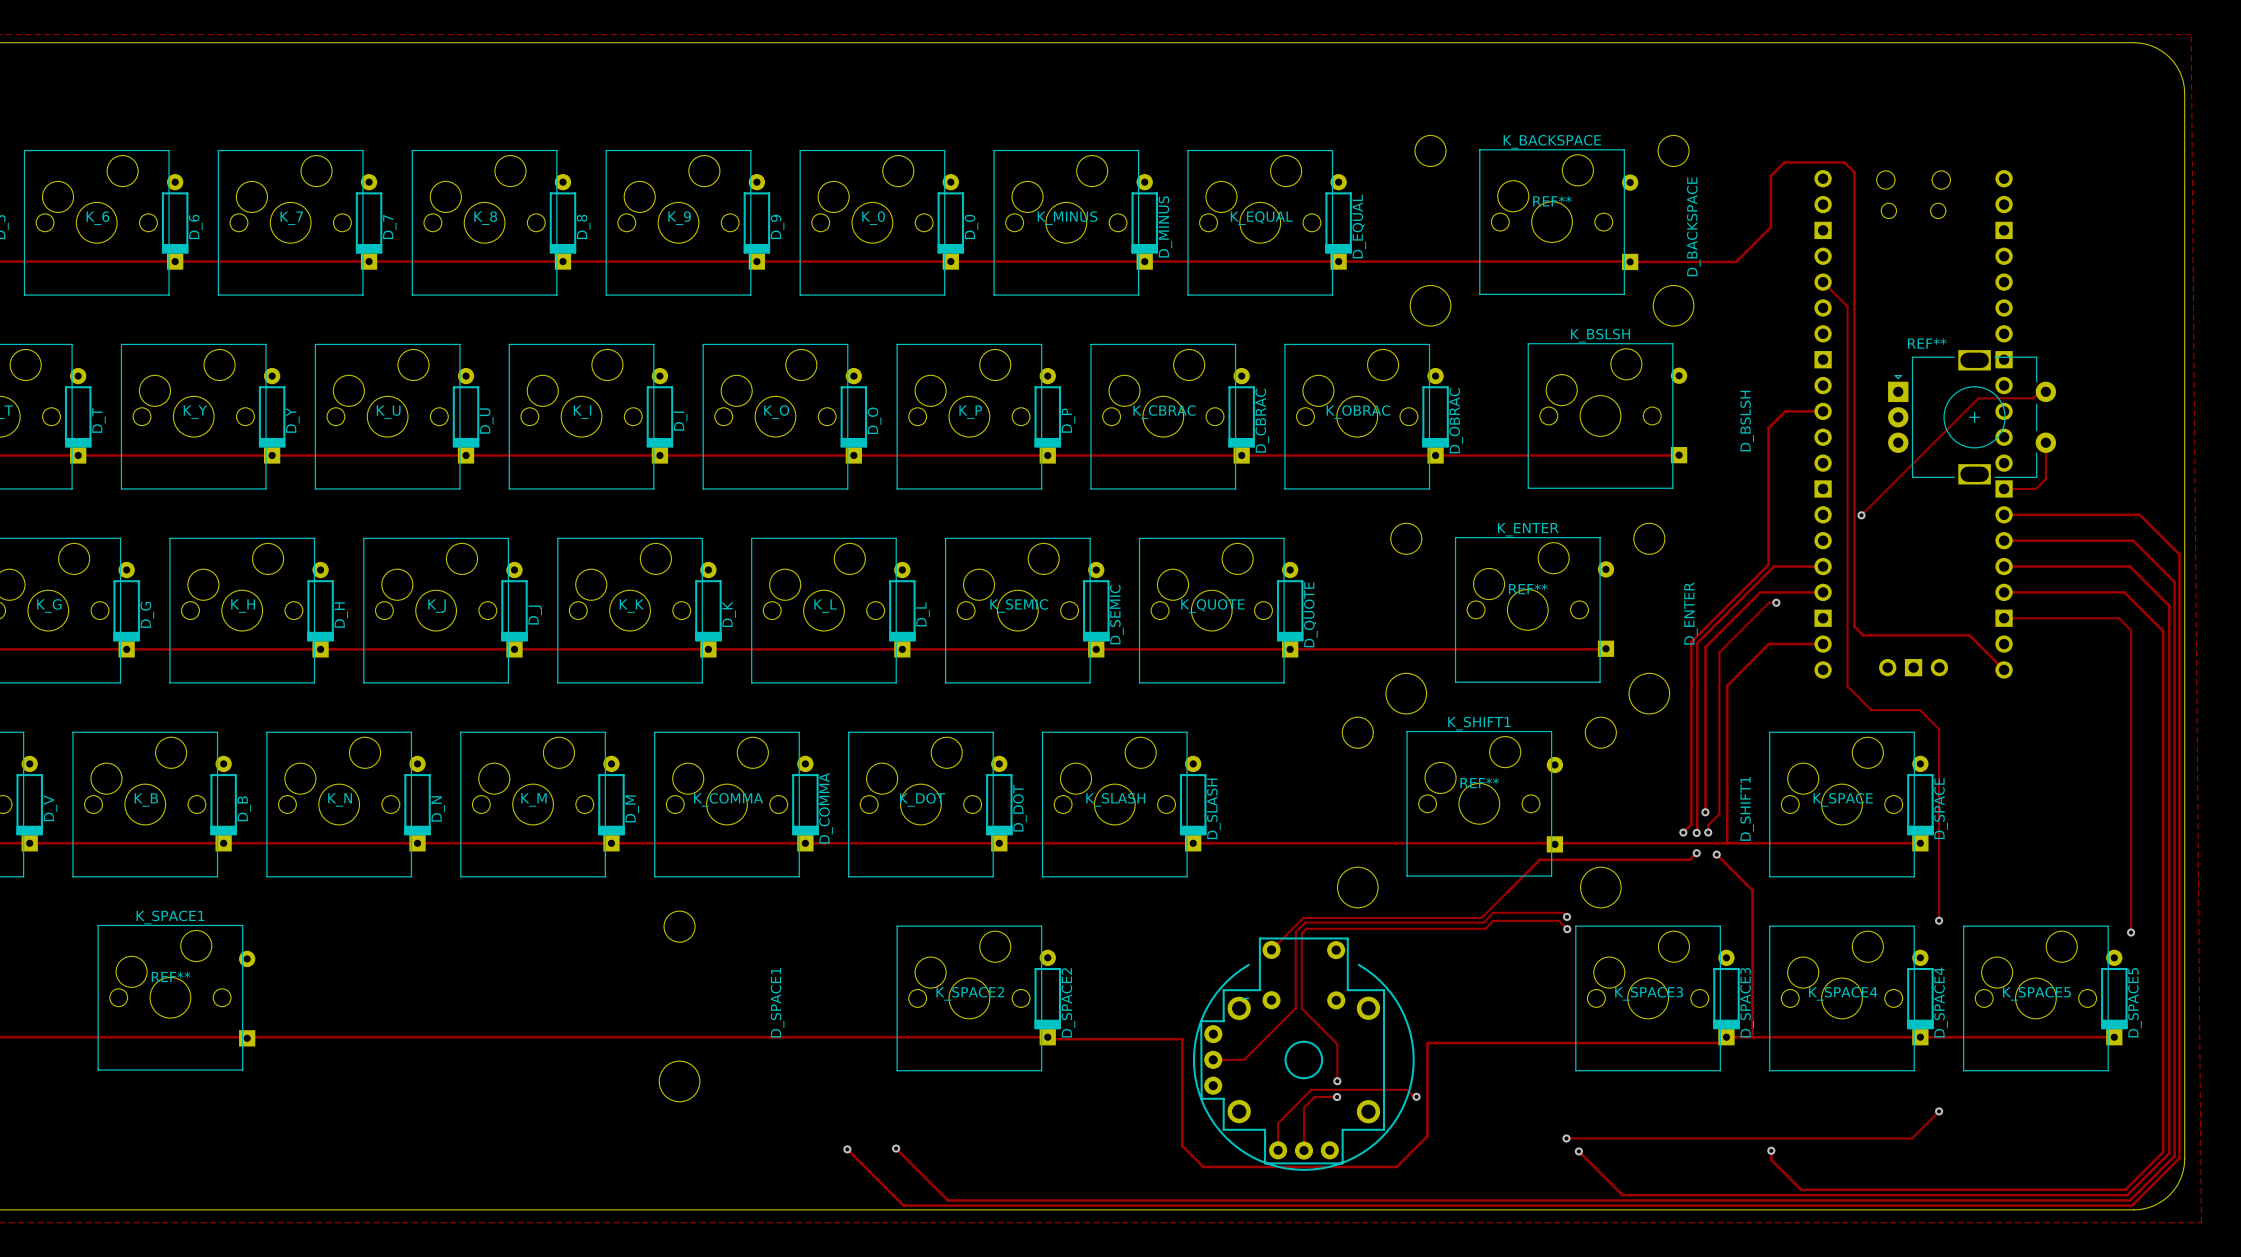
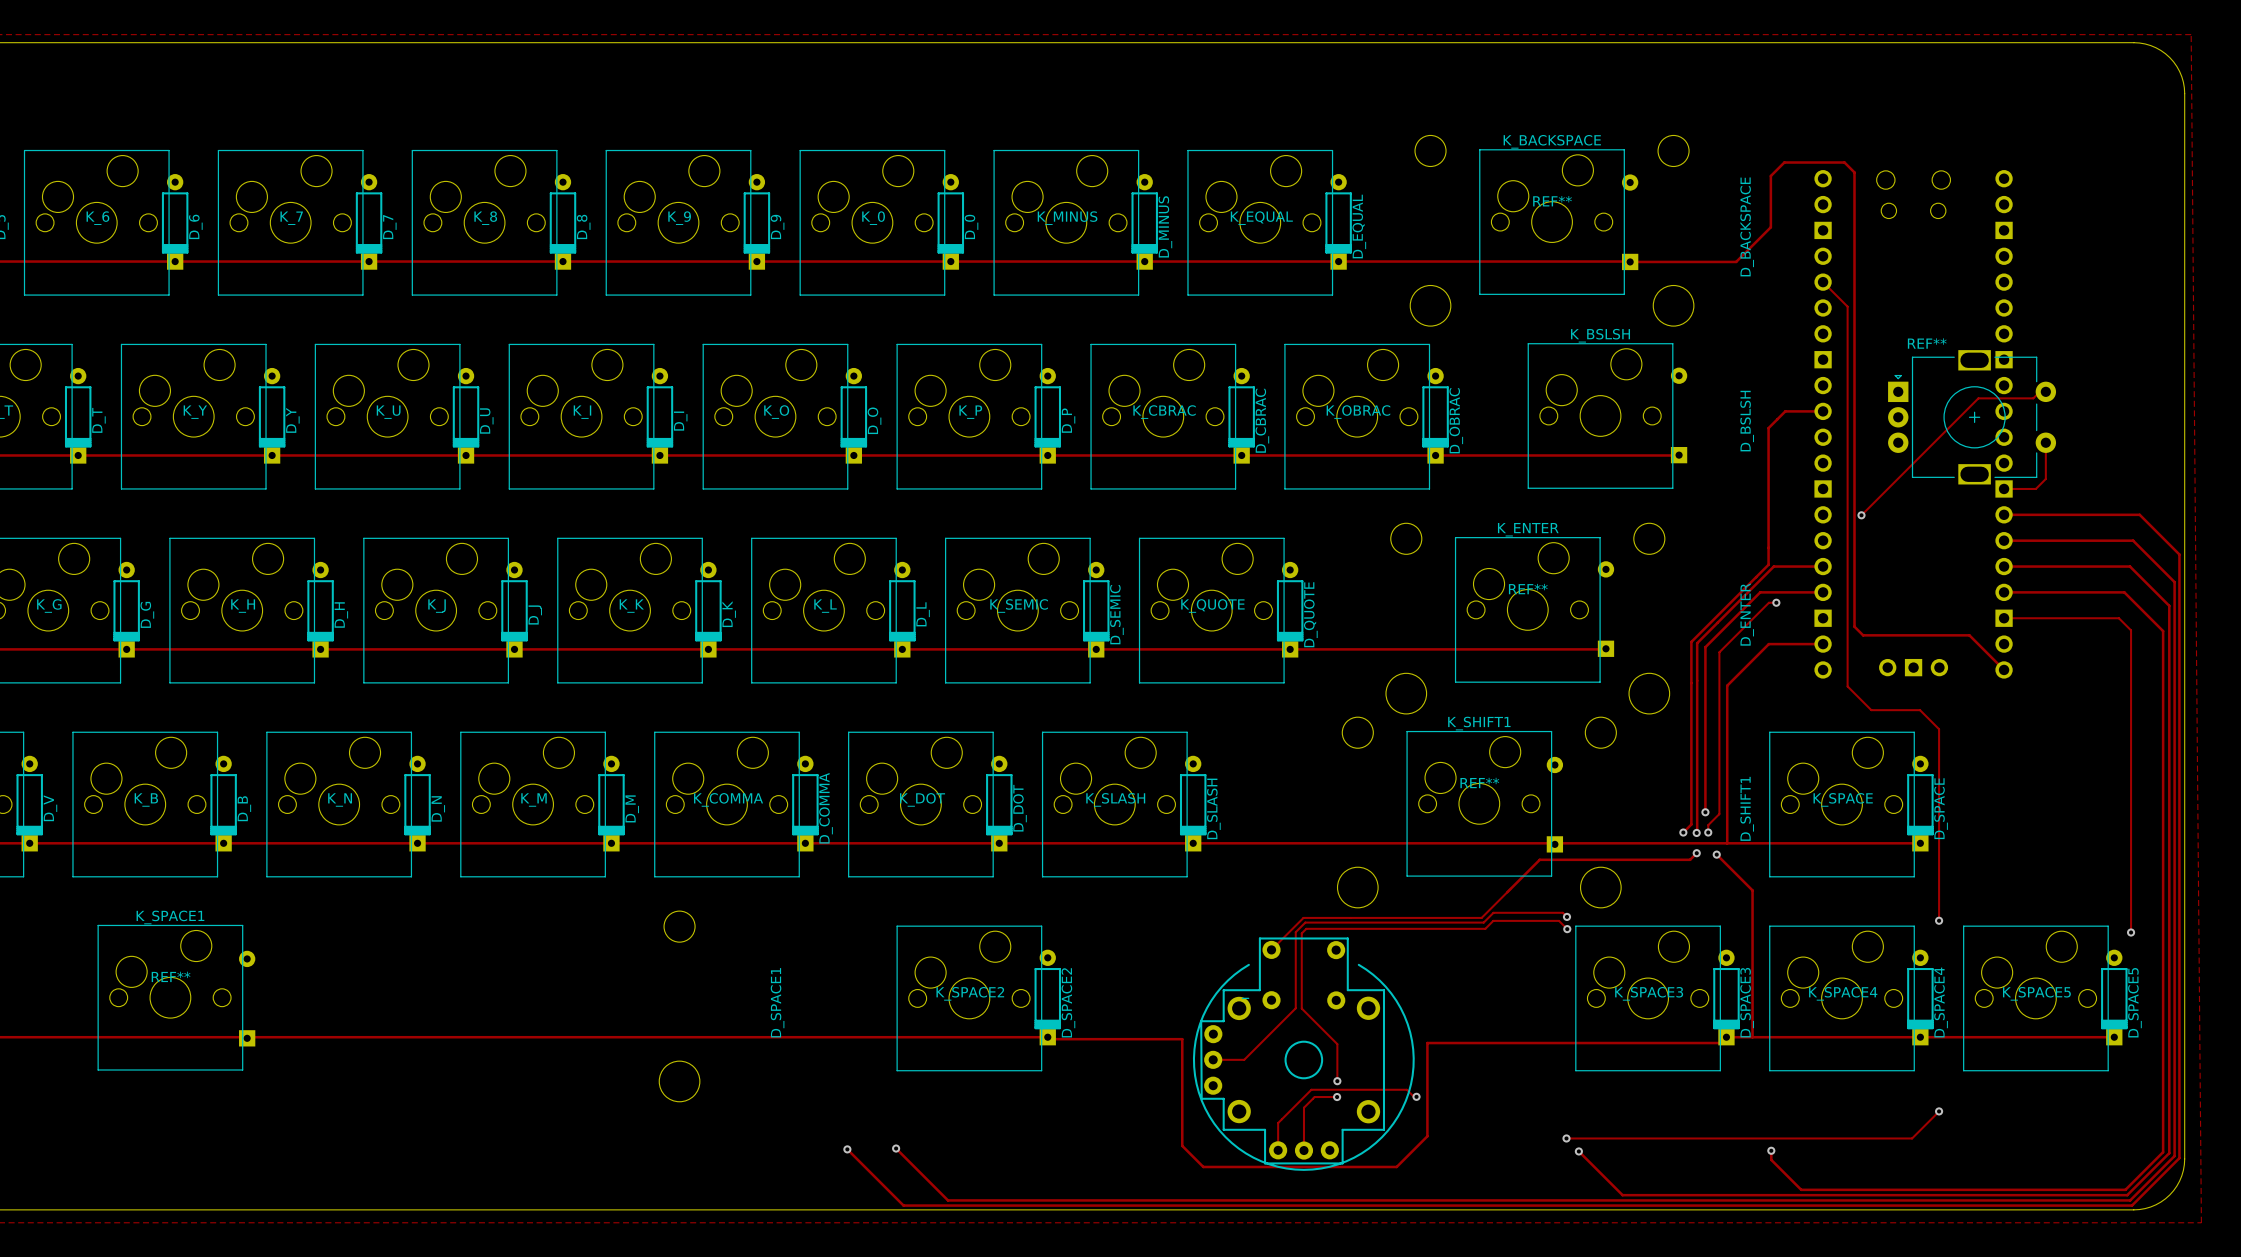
D_BACKSPACE position: (1693, 226) -> (1747, 226)
D_ENTER position: (1691, 613) -> (1747, 614)

